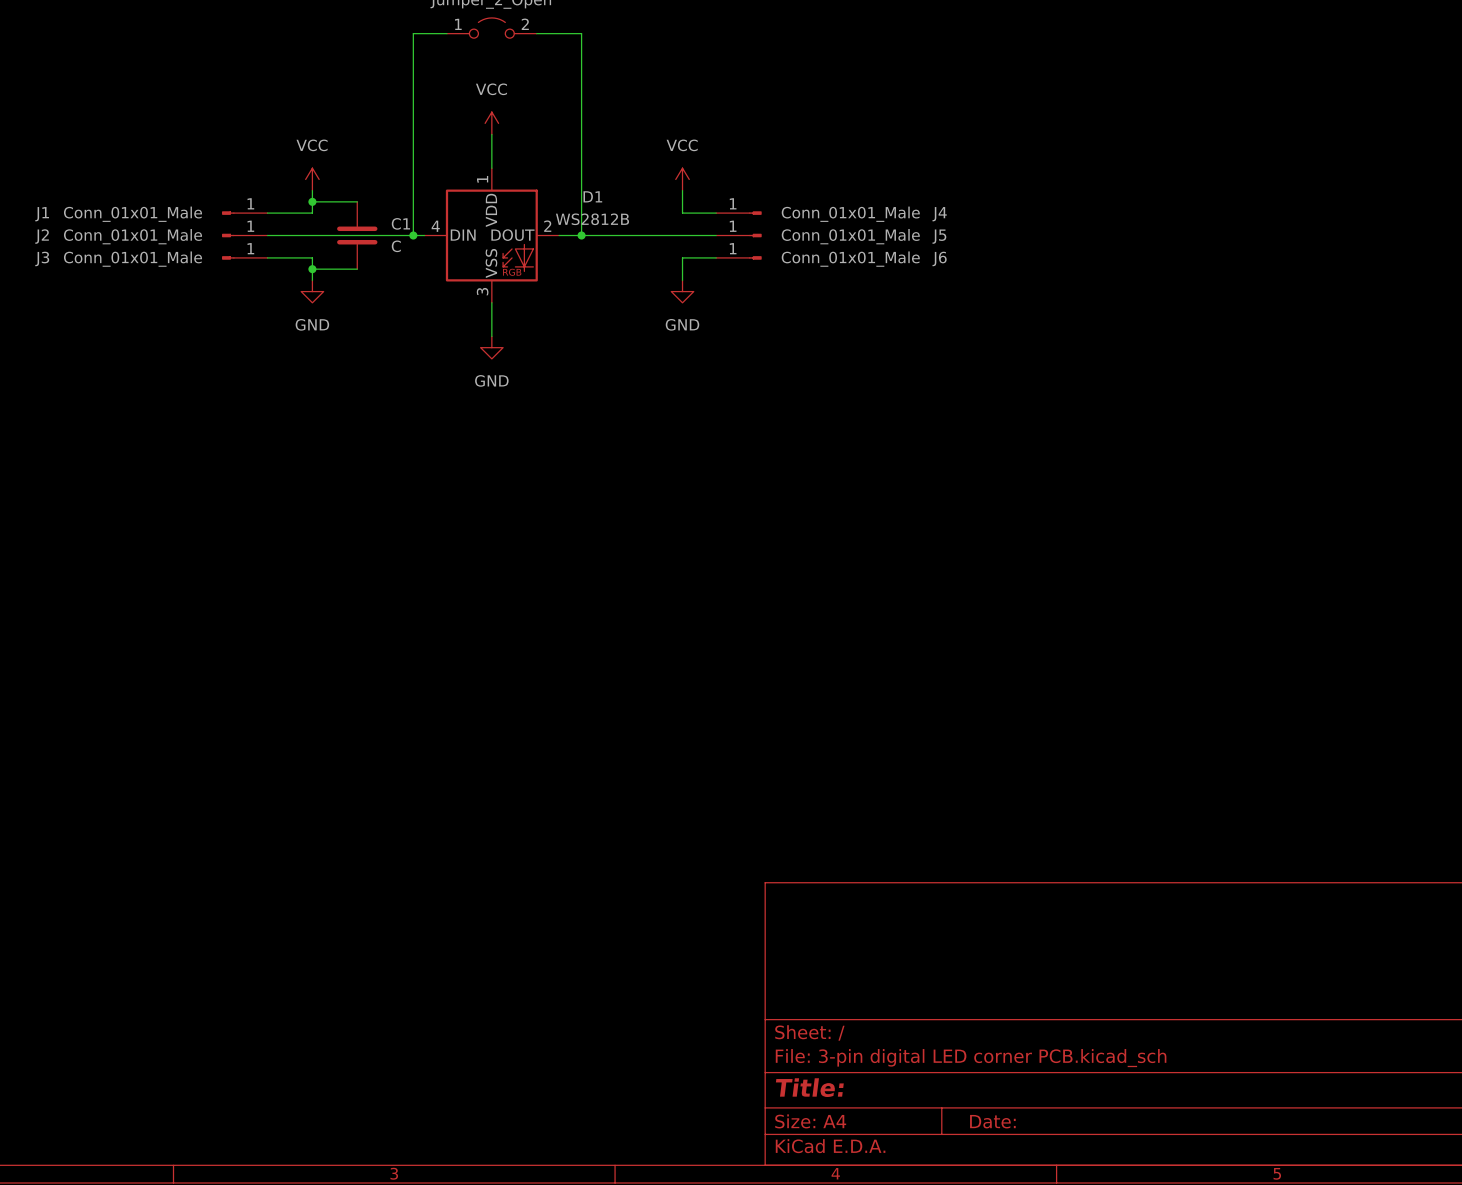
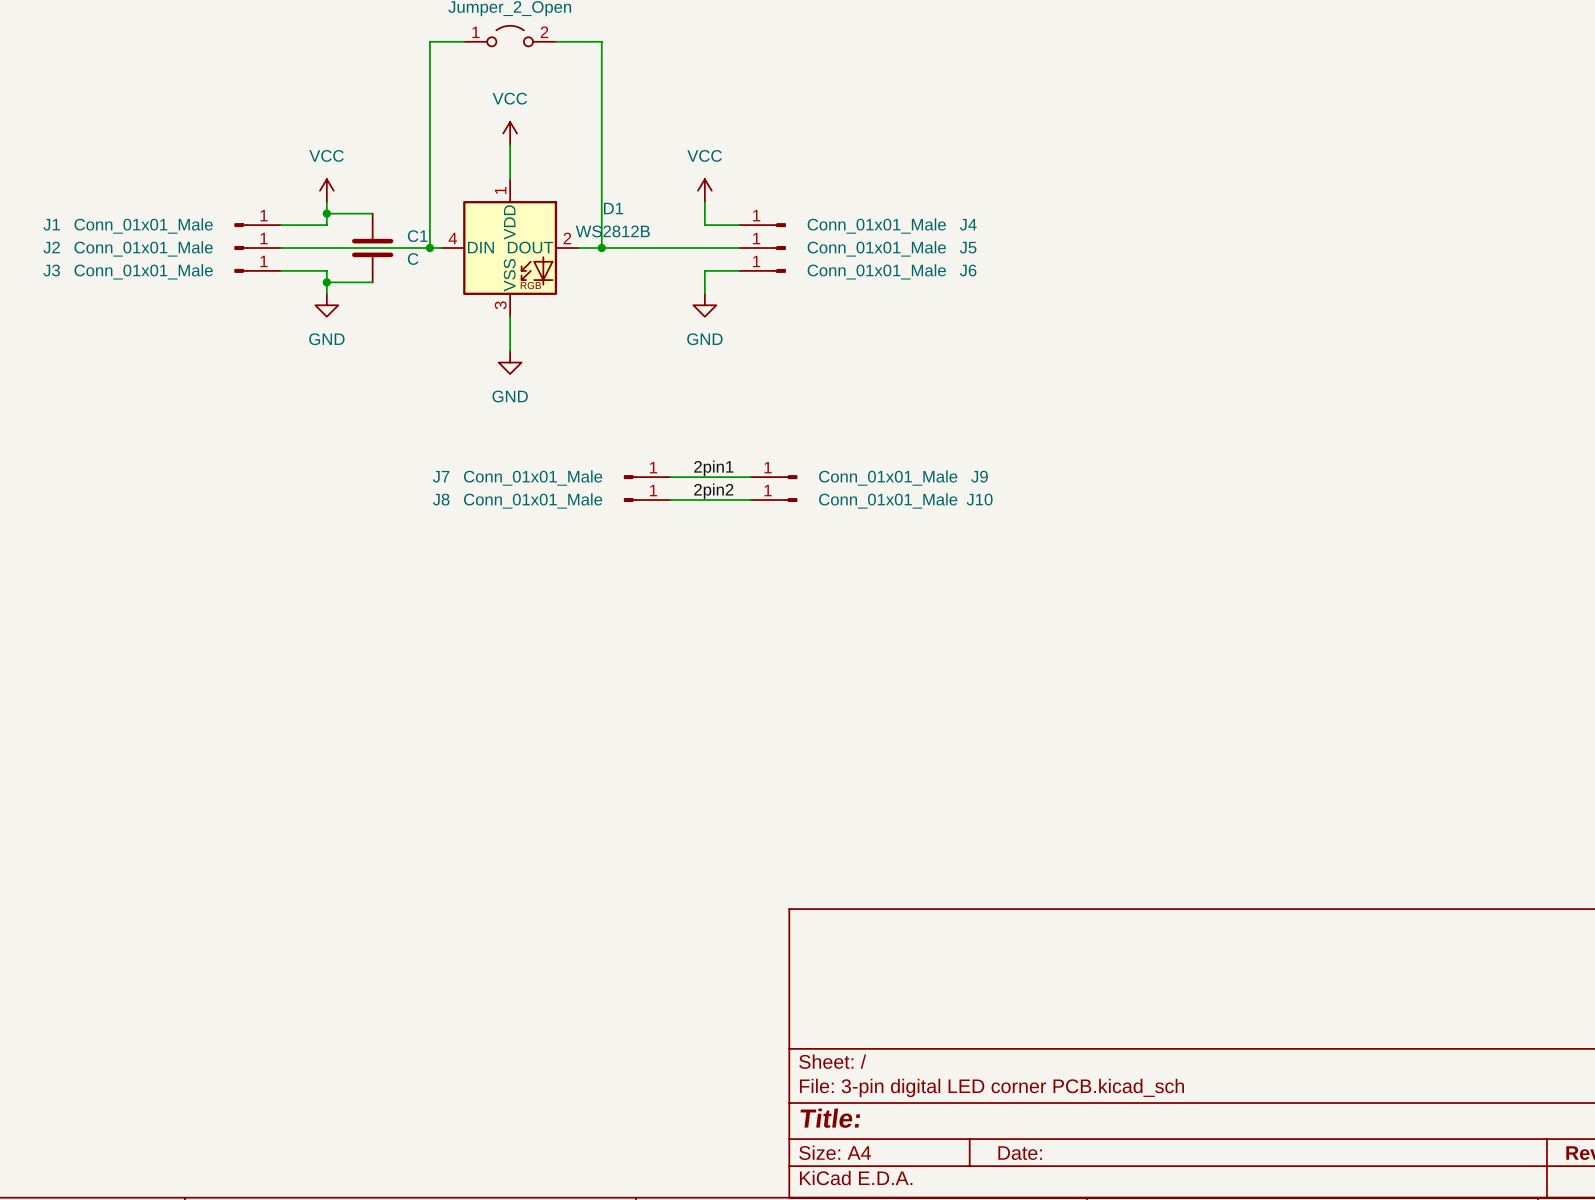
label: none -> 2pin1 (713, 468)
J7: none -> Conn_01x01_Male (647, 477)
wire: none -> (670, 477) (750, 477)
J9: none -> Conn_01x01_Male (773, 477)
label: none -> 2pin2 (713, 491)
J8: none -> Conn_01x01_Male (647, 500)
wire: none -> (670, 500) (750, 500)
J10: none -> Conn_01x01_Male (773, 500)

